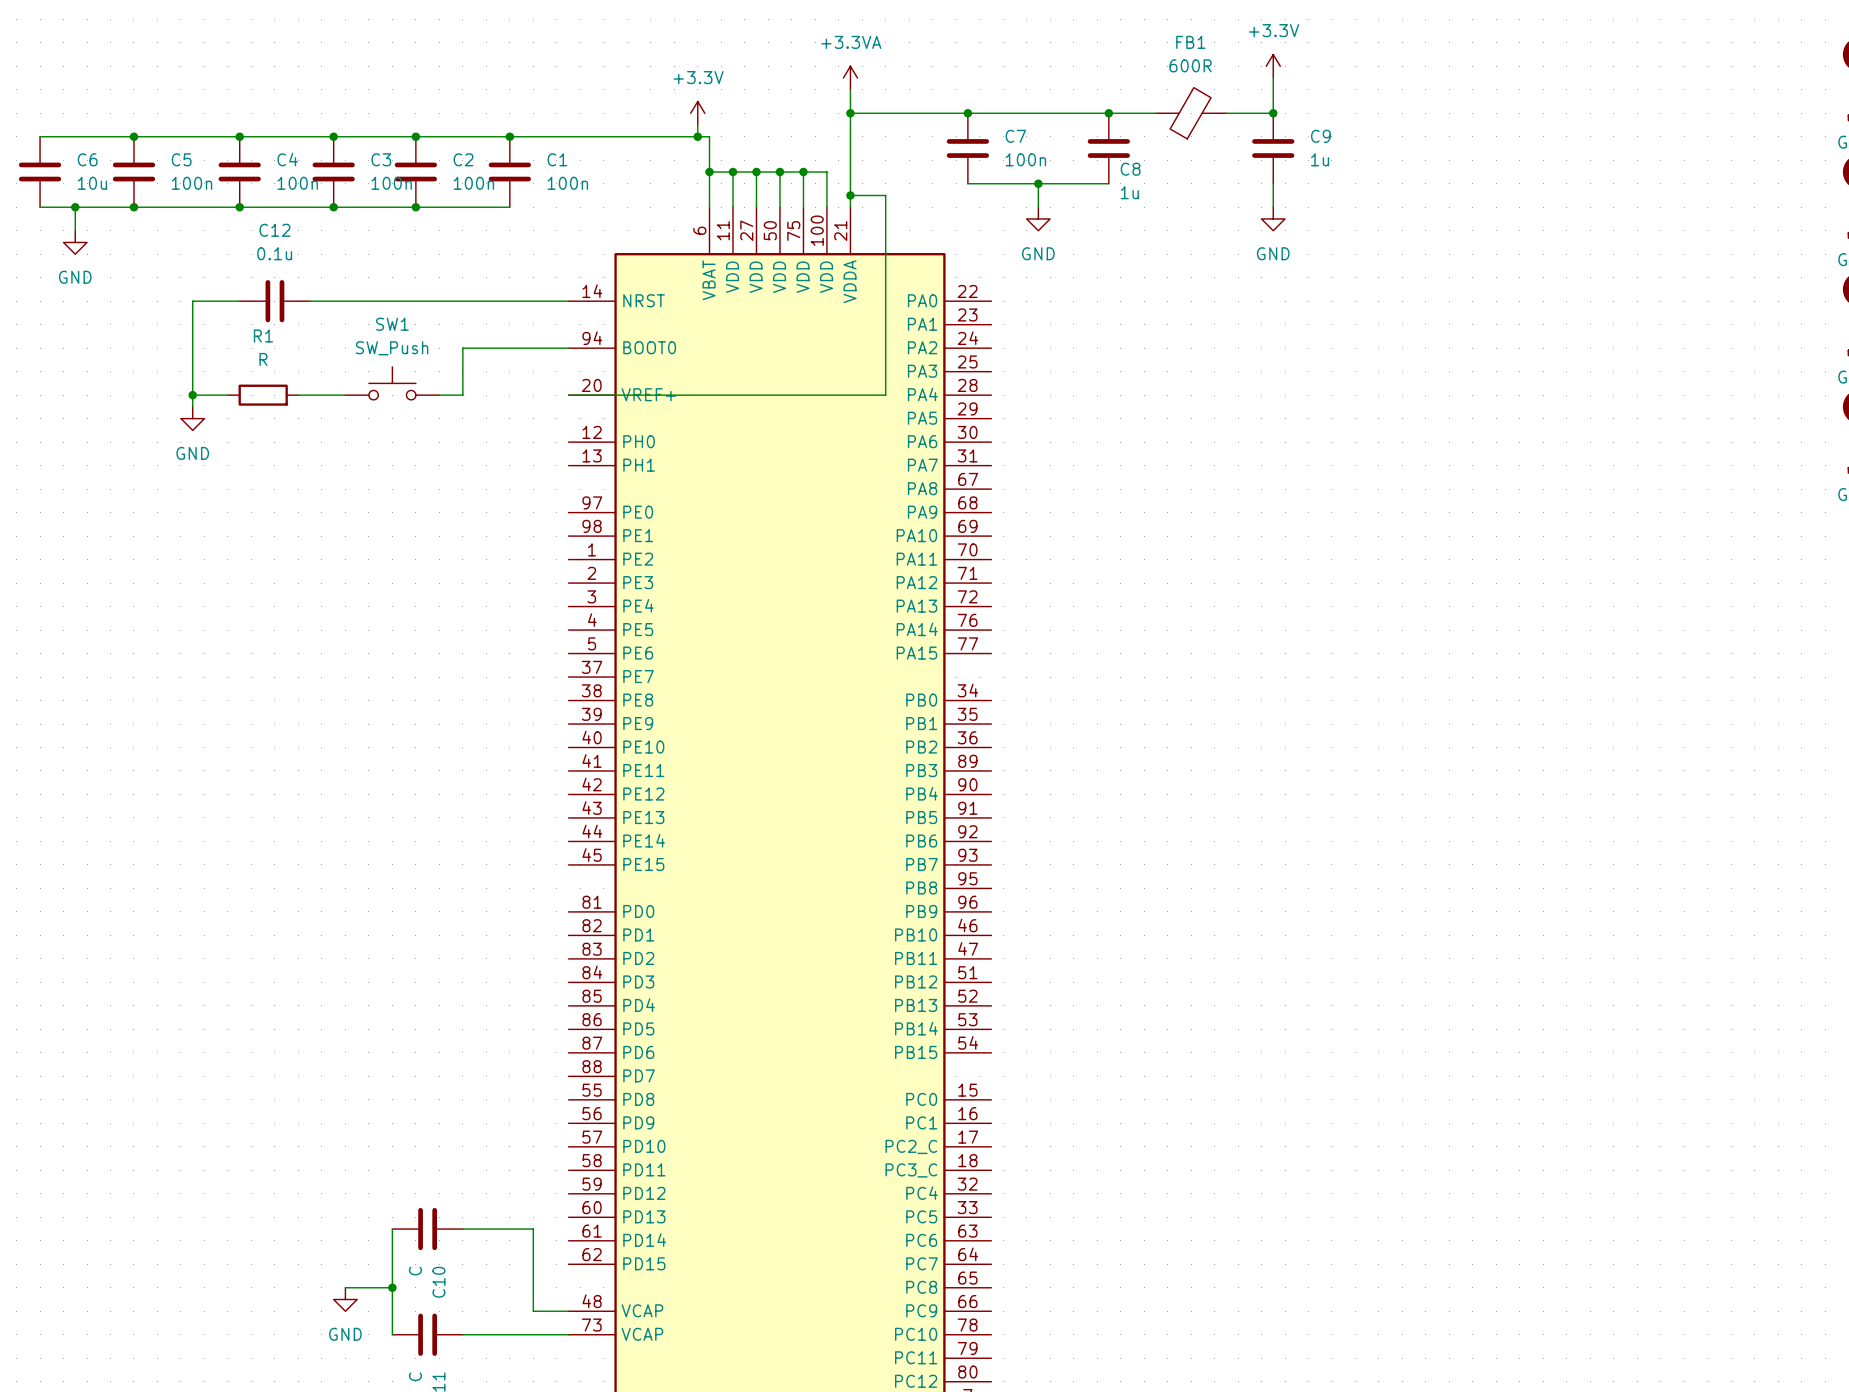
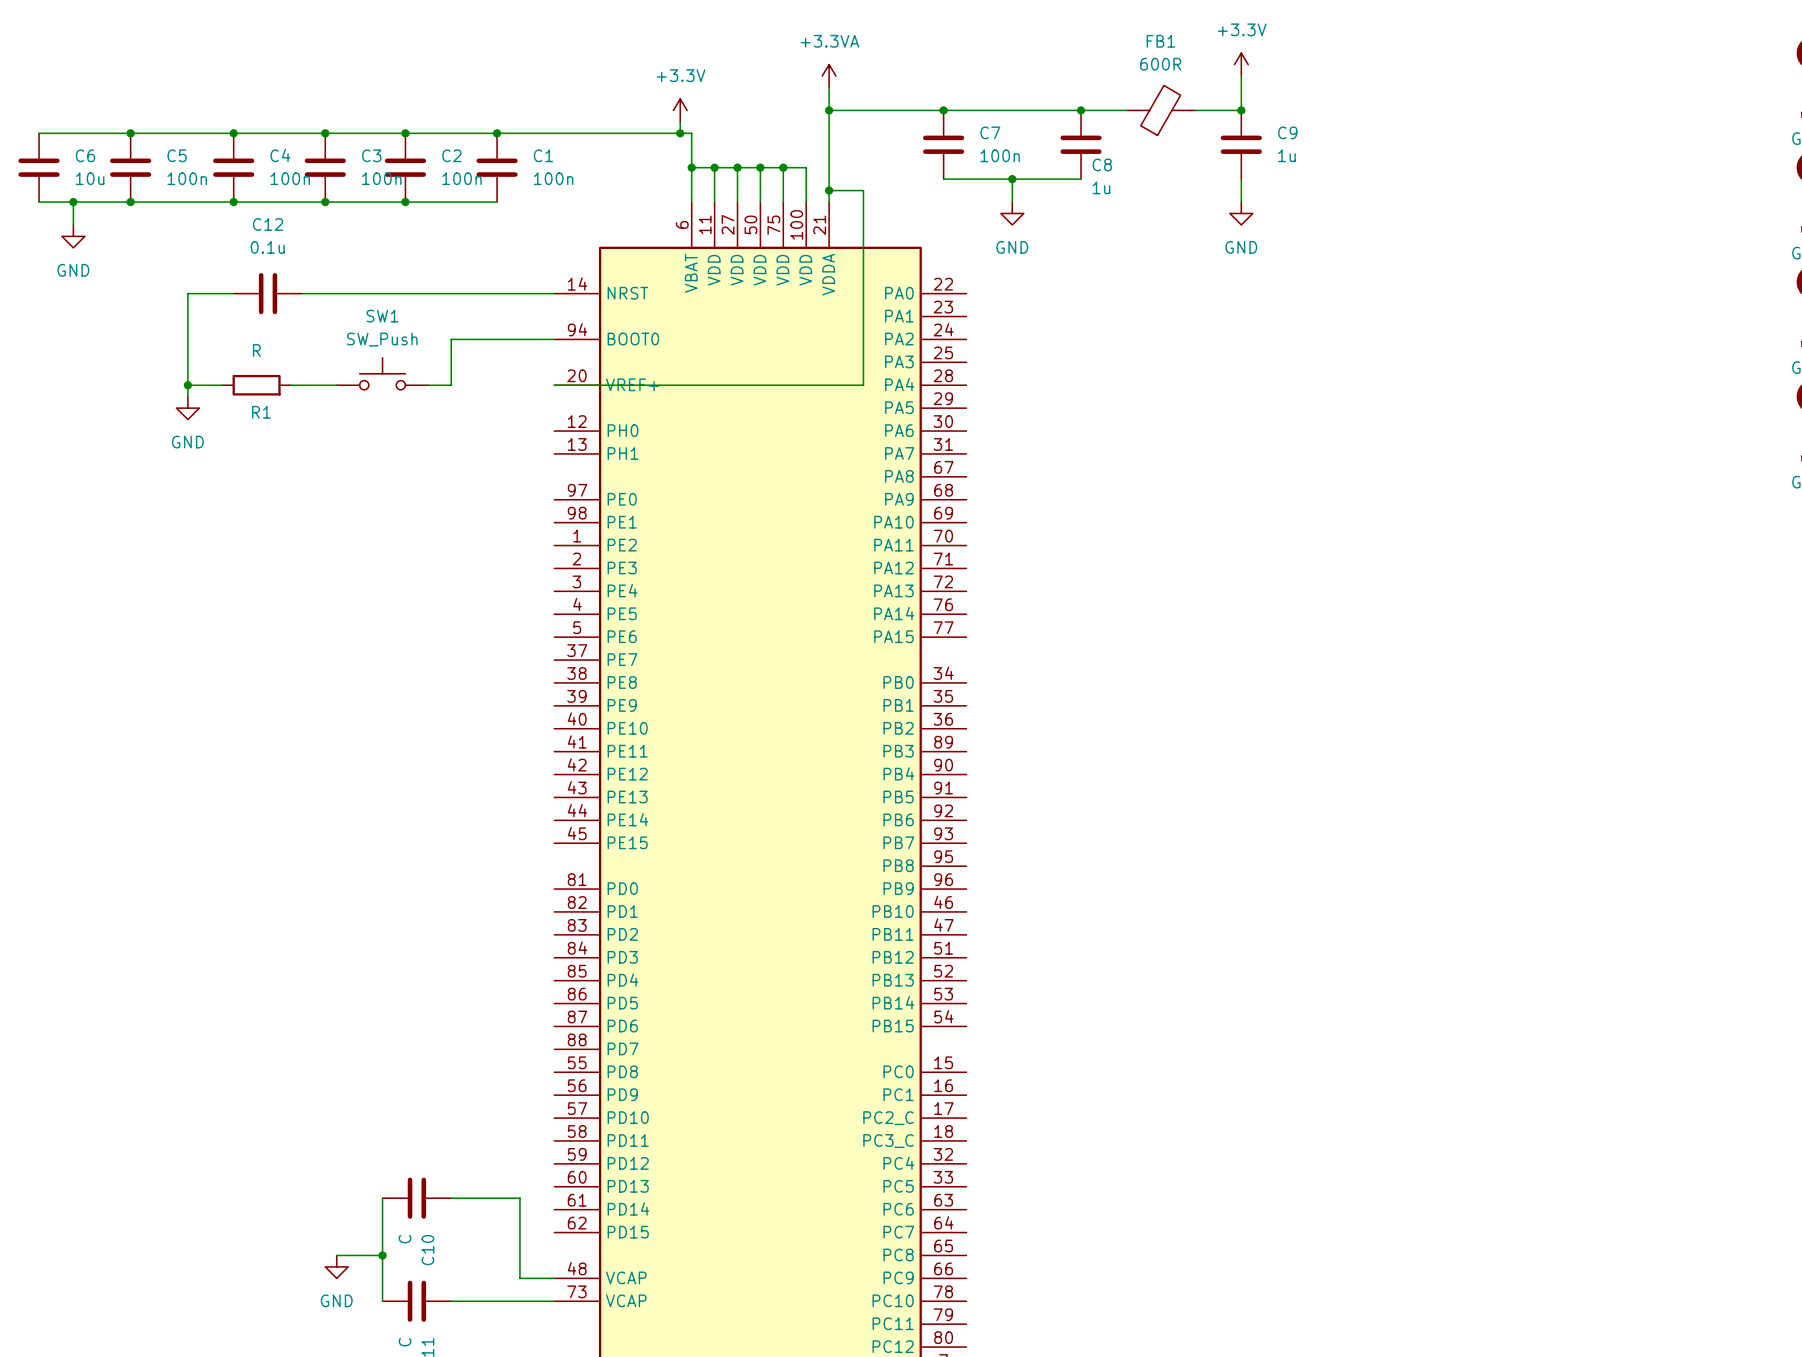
R1 name position: R1 (263, 335) -> R1 (261, 412)

